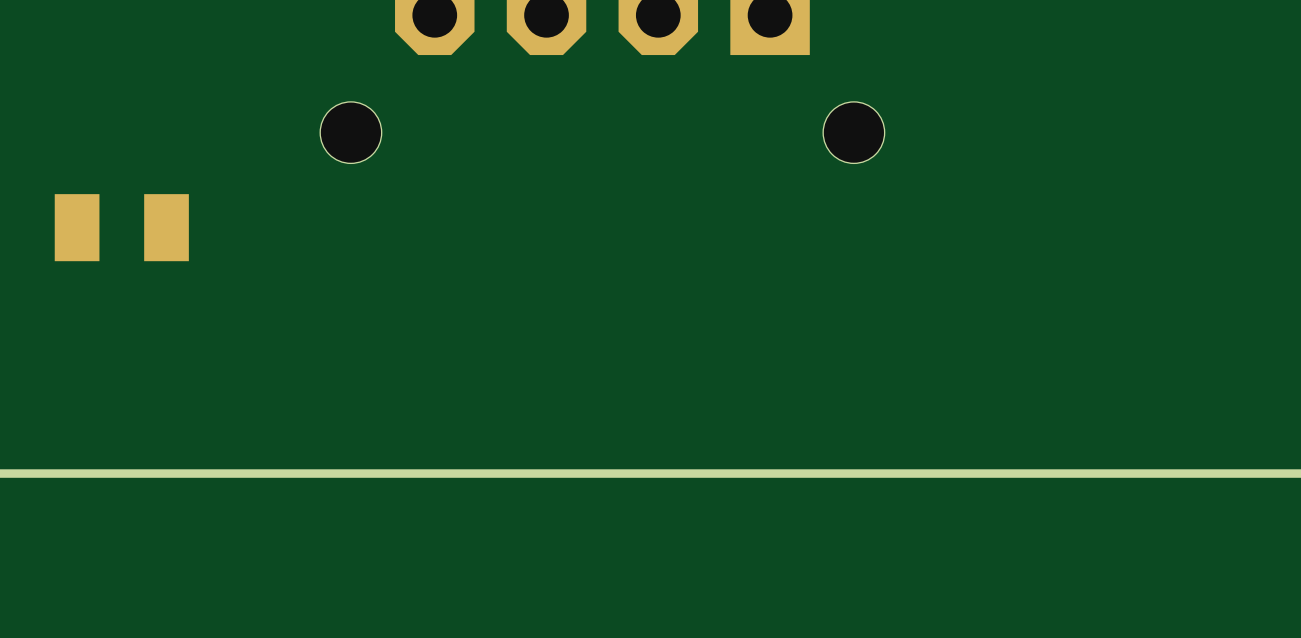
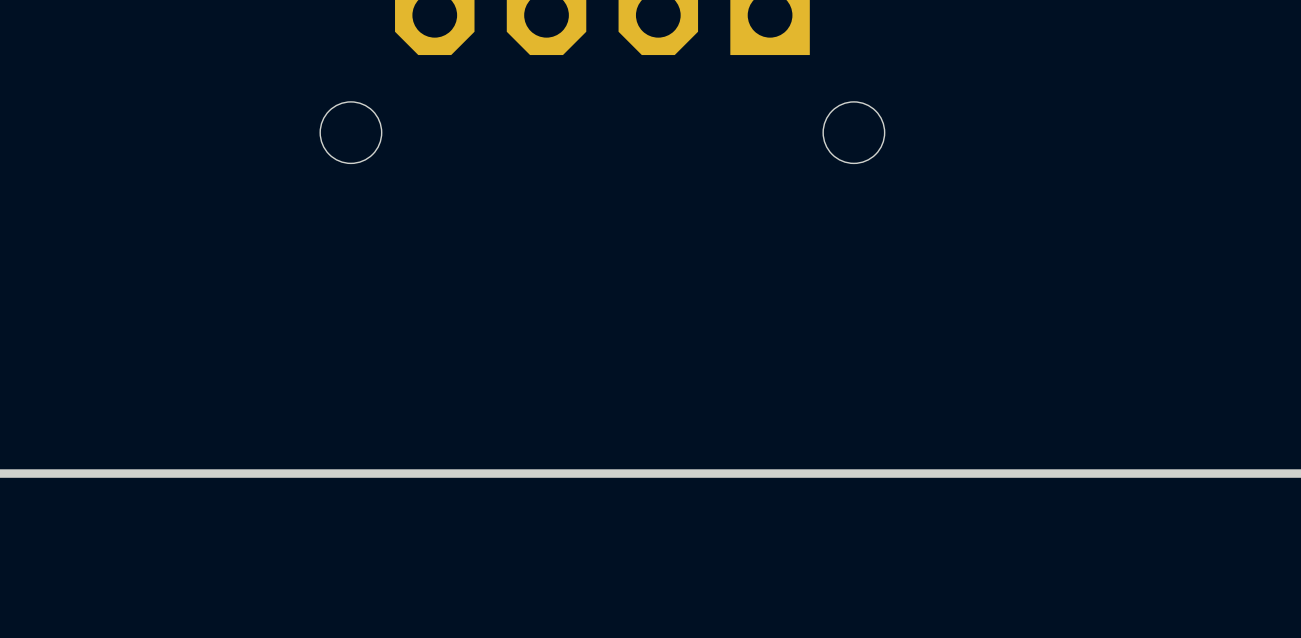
part: (121, 227) -> none

